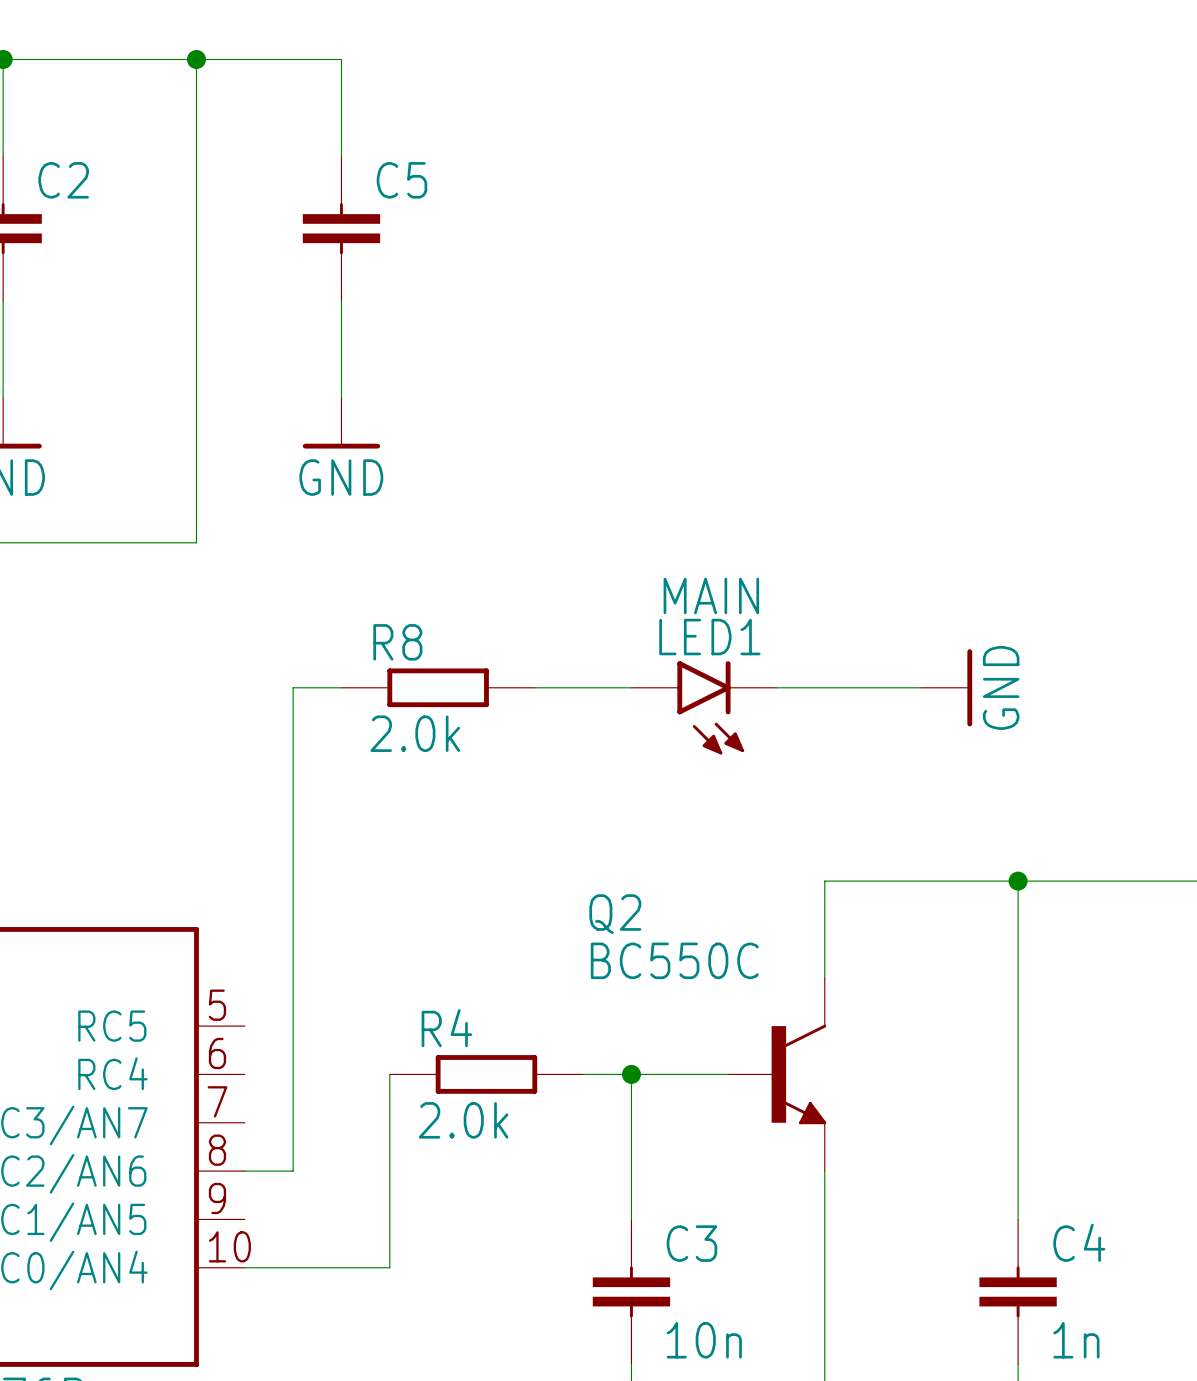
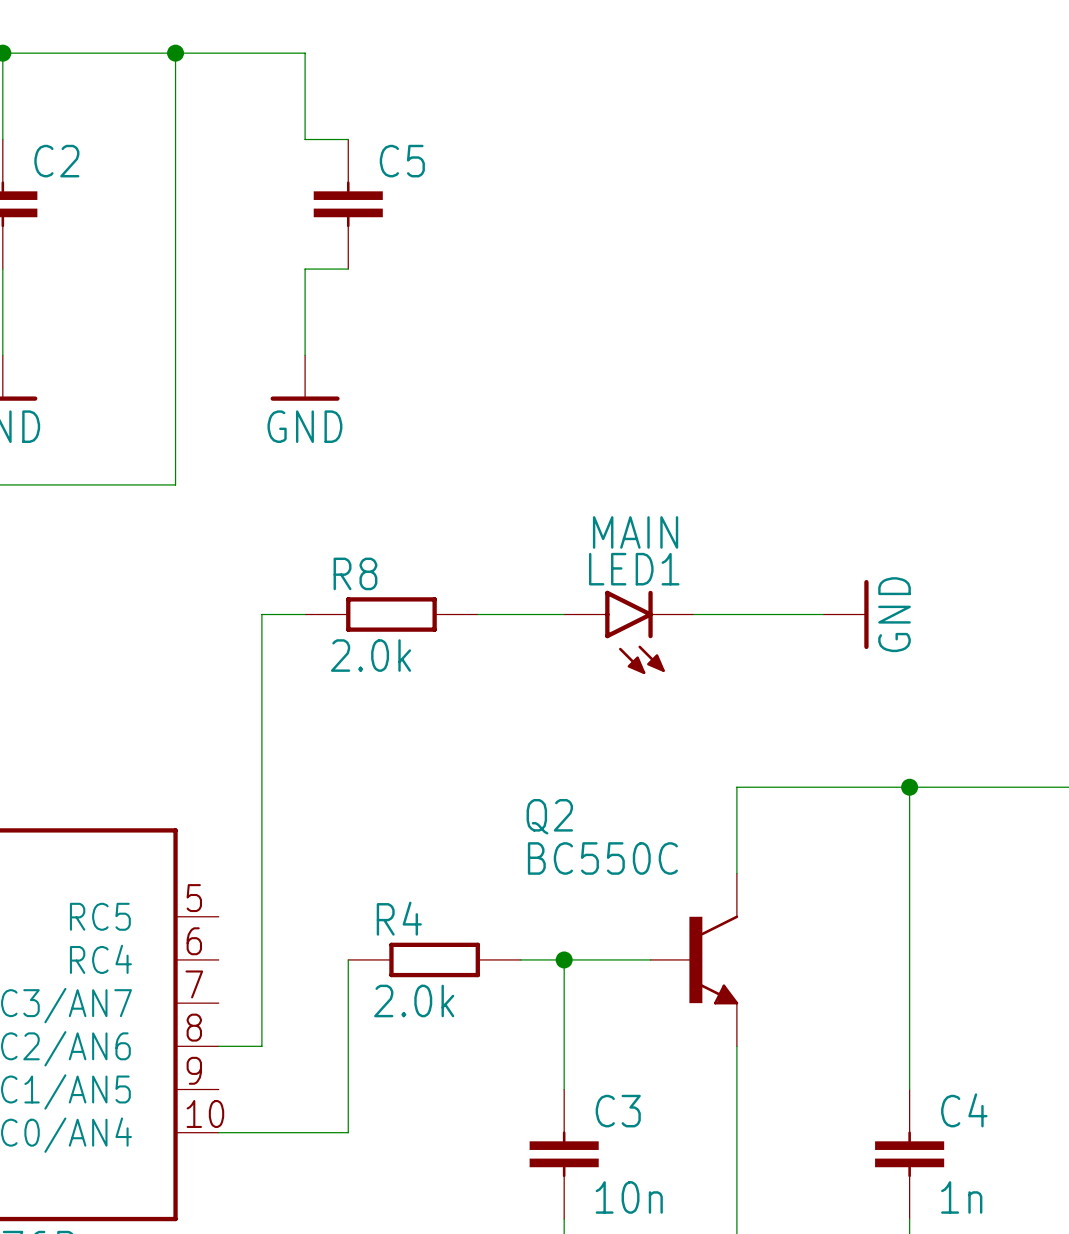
wire: none -> (305, 139) (348, 139)
C5 position: (341, 228) -> (348, 204)
wire: none -> (305, 269) (348, 269)

